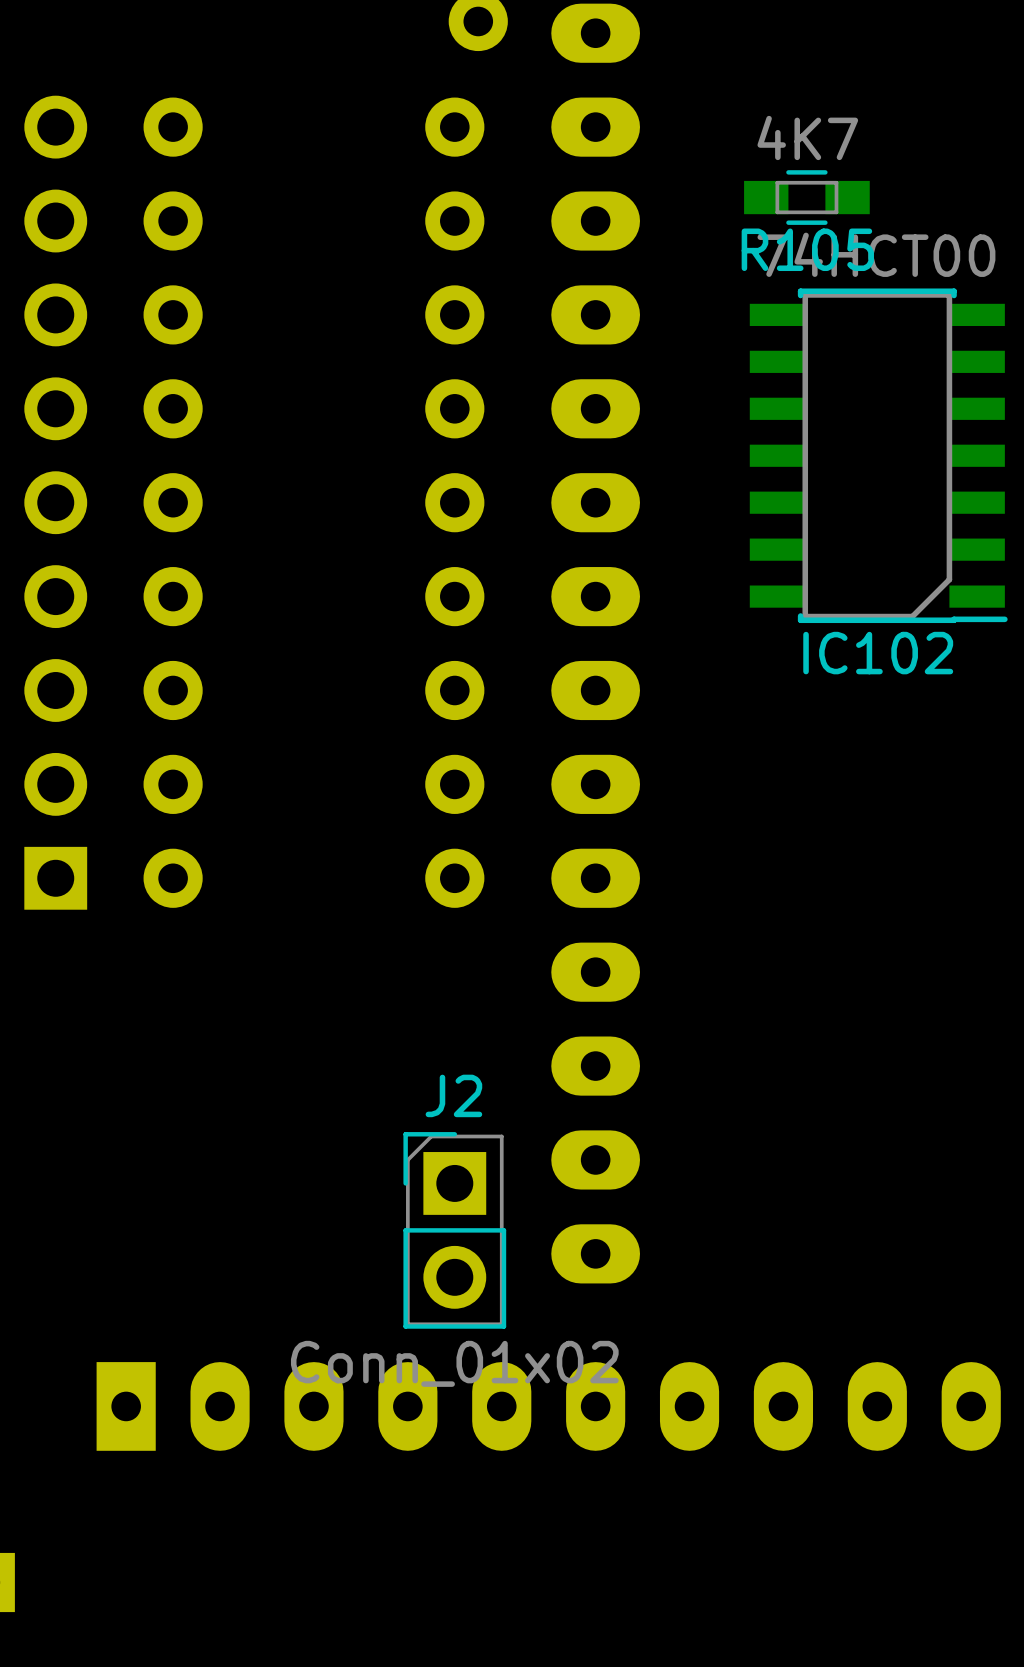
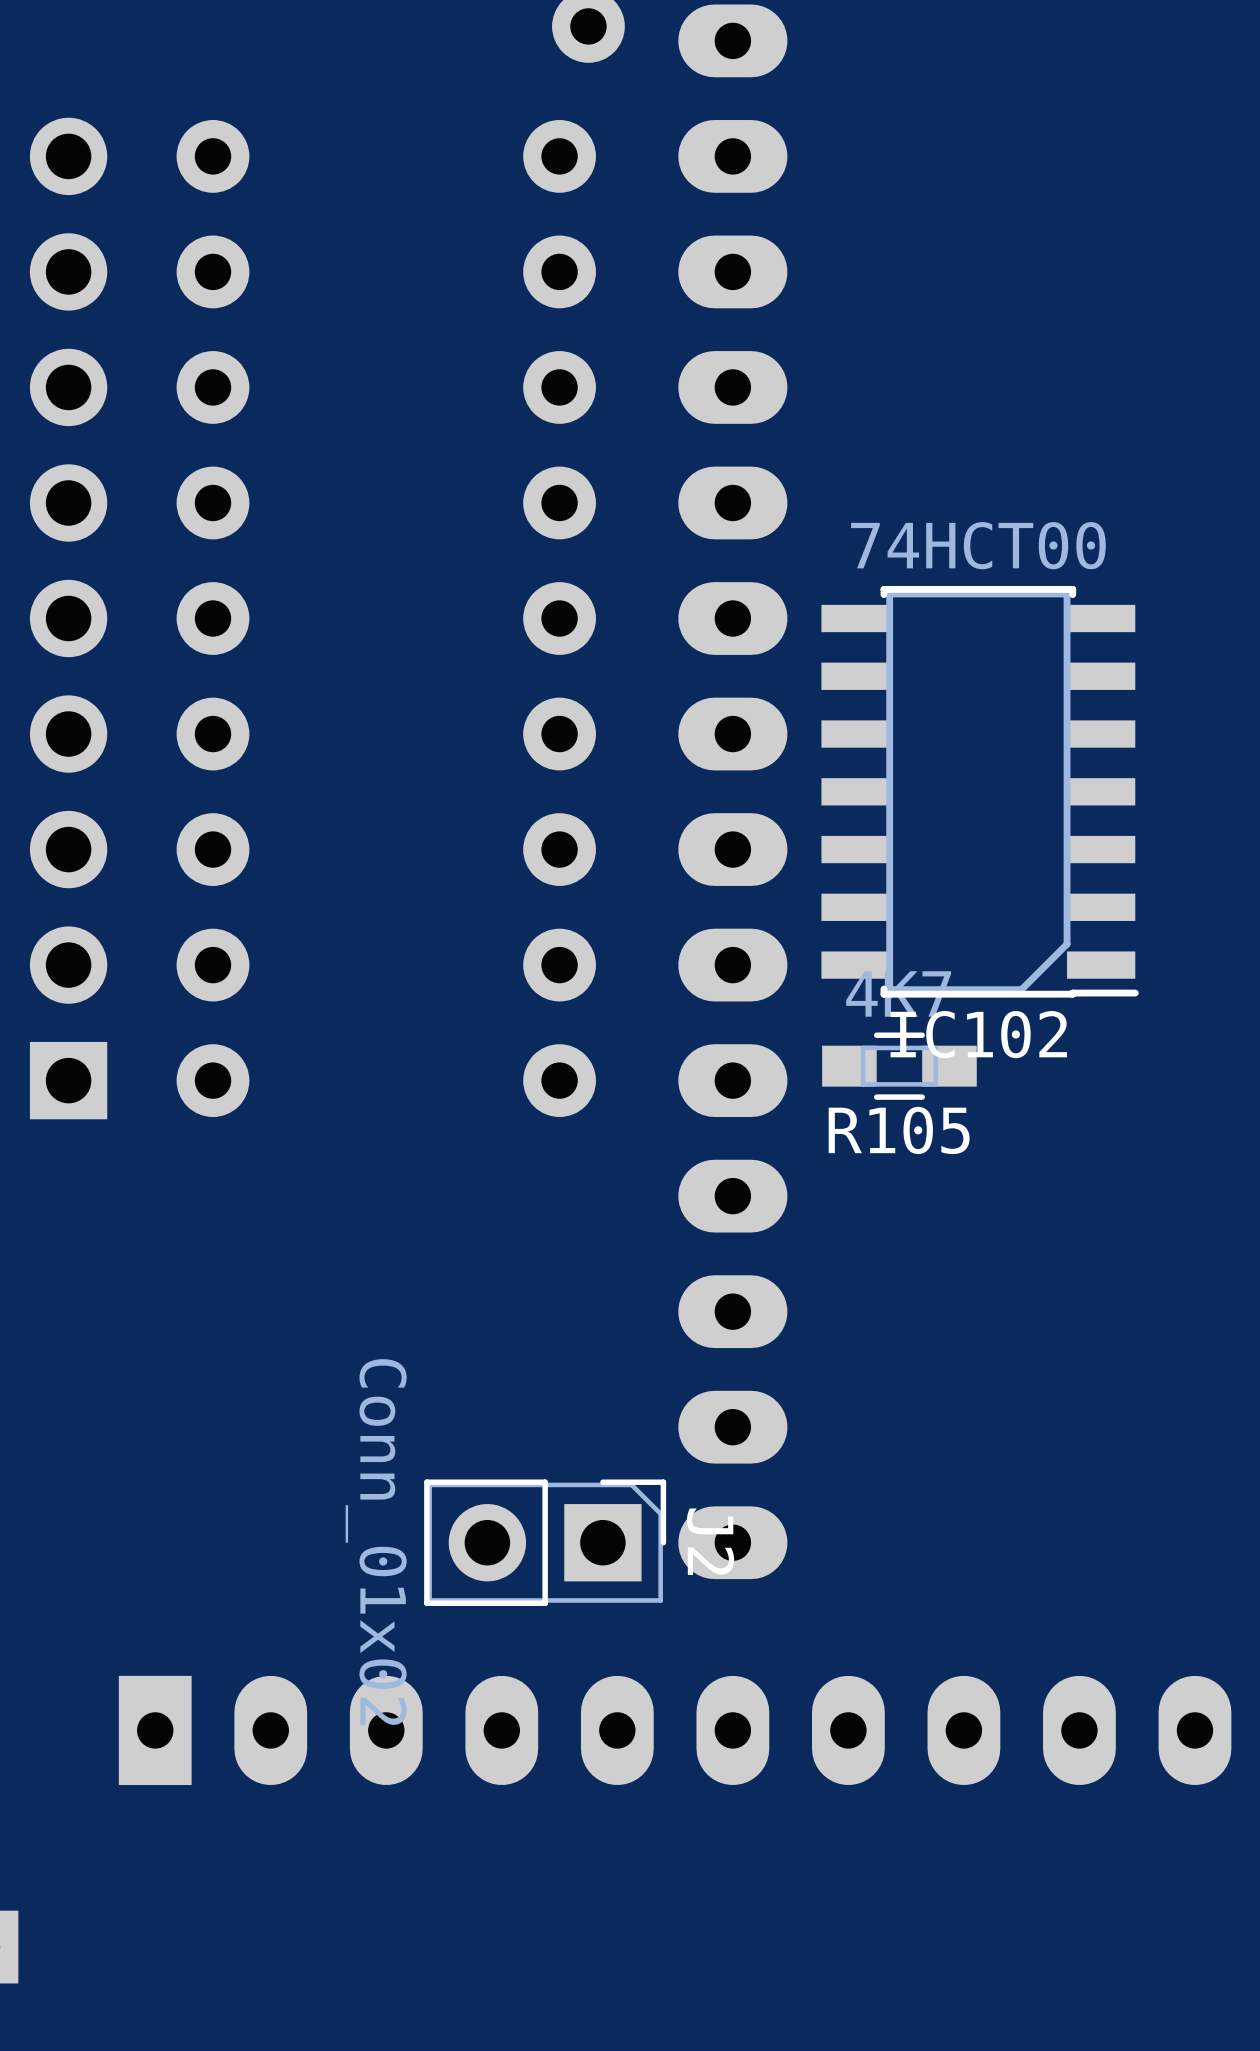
R105 position: (806, 197) -> (899, 1066)
IC102 position: (878, 455) -> (980, 791)
J2 rotation: 0° (454, 1230) -> 90° clockwise (545, 1542)

